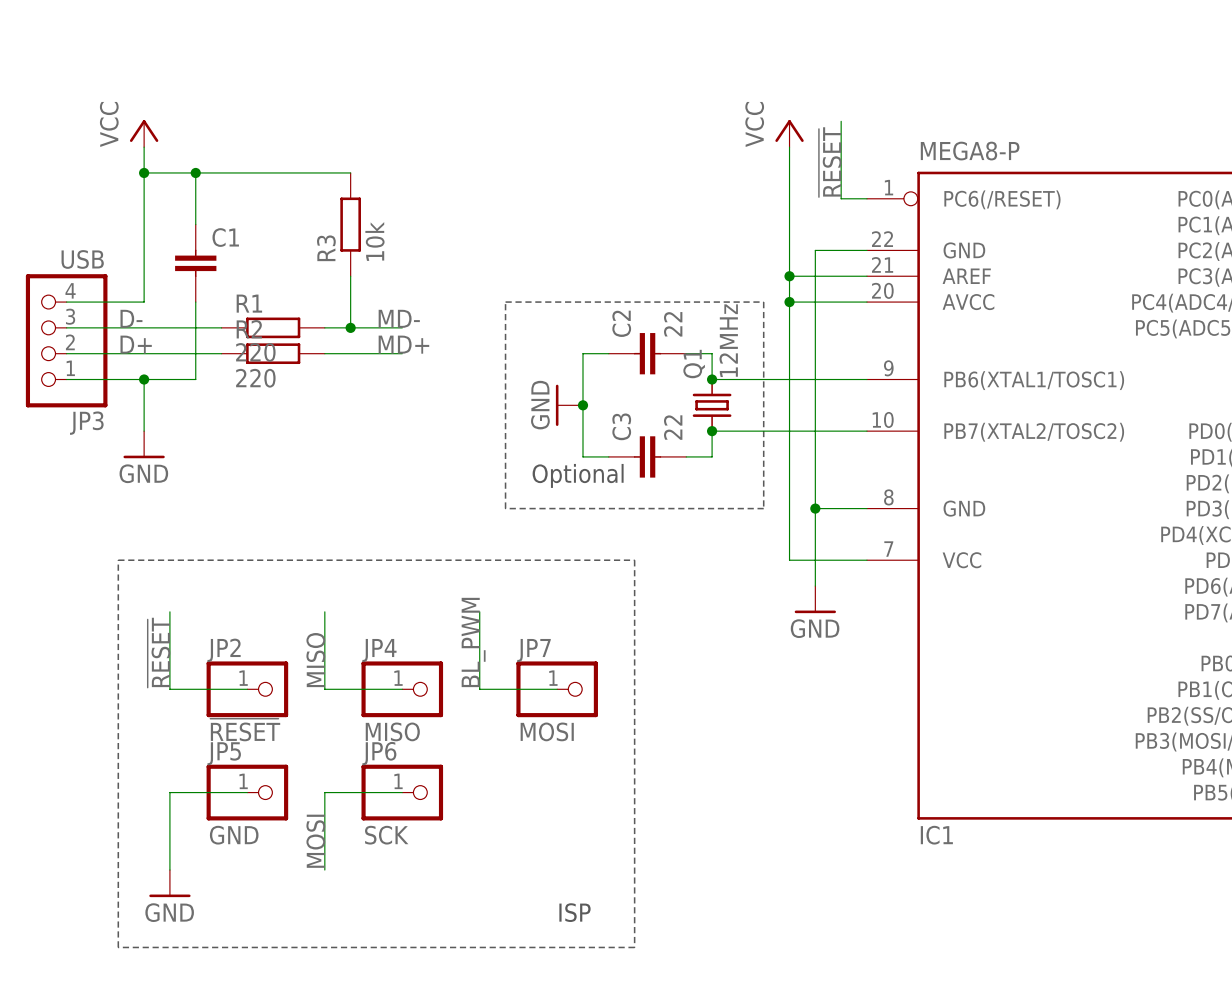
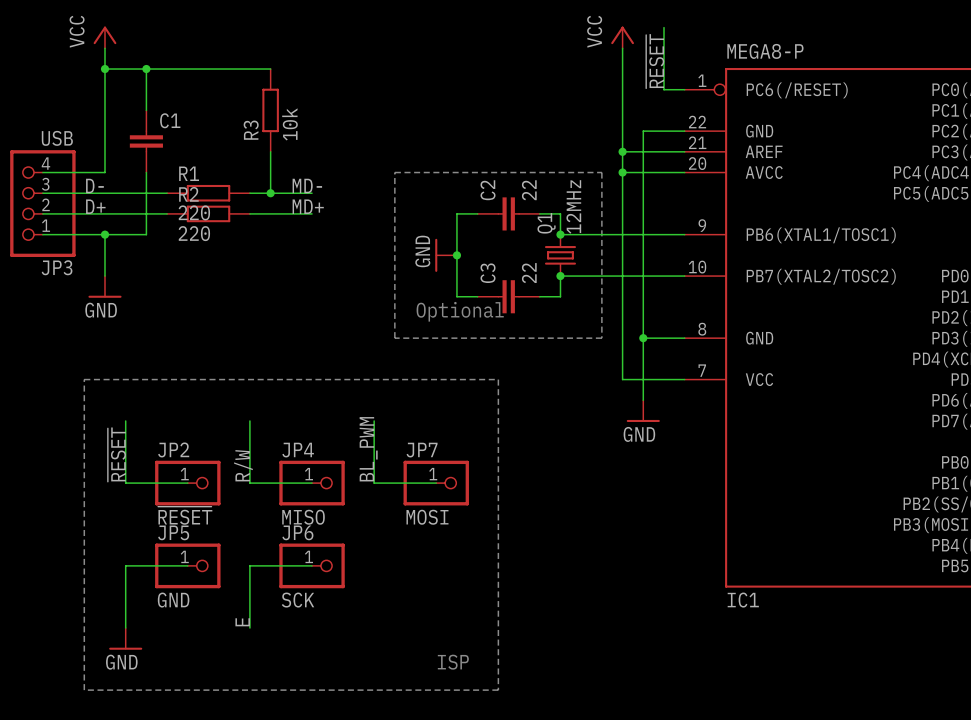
label: MISO (315, 660) -> R/W (243, 465)
label: MOSI (315, 841) -> E (242, 622)

